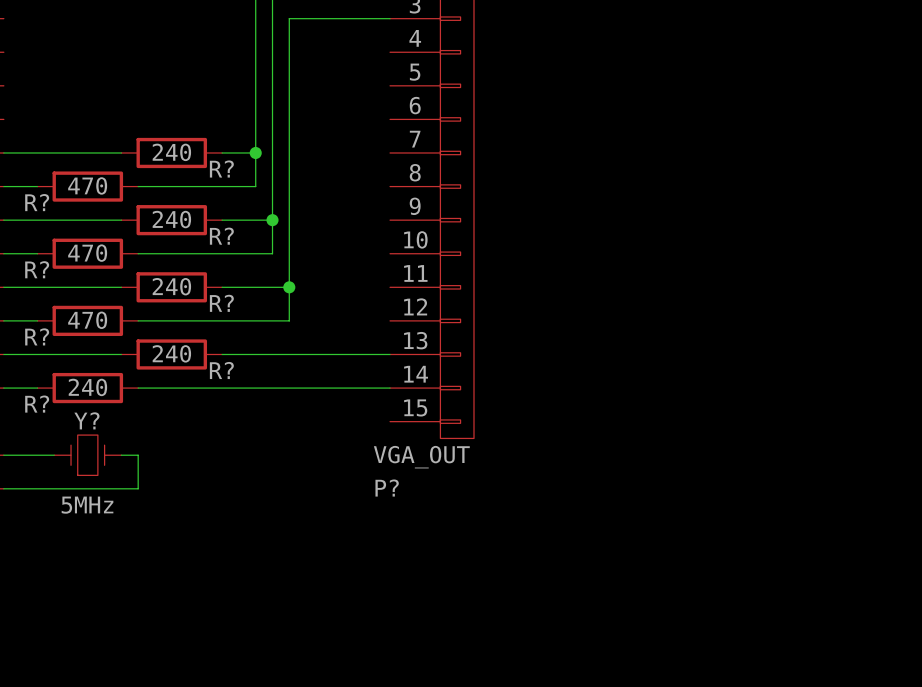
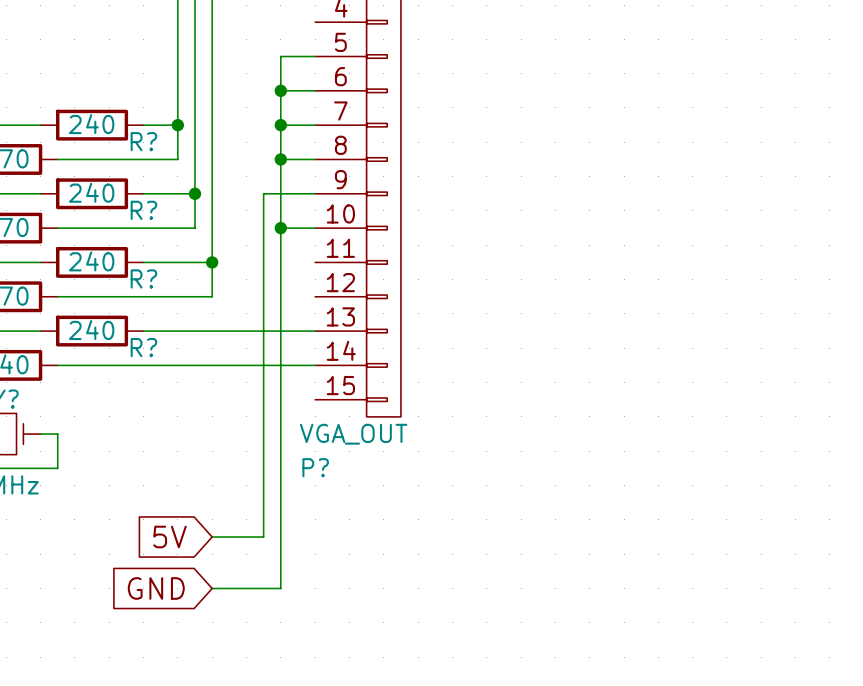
wire: none -> (315, 56) (280, 56) (280, 588) (212, 588)
wire: none -> (280, 90) (315, 90)
junction: none -> (280, 90)
wire: none -> (280, 125) (315, 125)
junction: none -> (280, 125)
wire: none -> (280, 159) (315, 159)
junction: none -> (280, 159)
wire: none -> (315, 193) (263, 193) (263, 537) (212, 537)
wire: none -> (280, 228) (315, 228)
junction: none -> (280, 228)
global label: none -> 5V (169, 537)
global label: none -> GND (156, 588)

